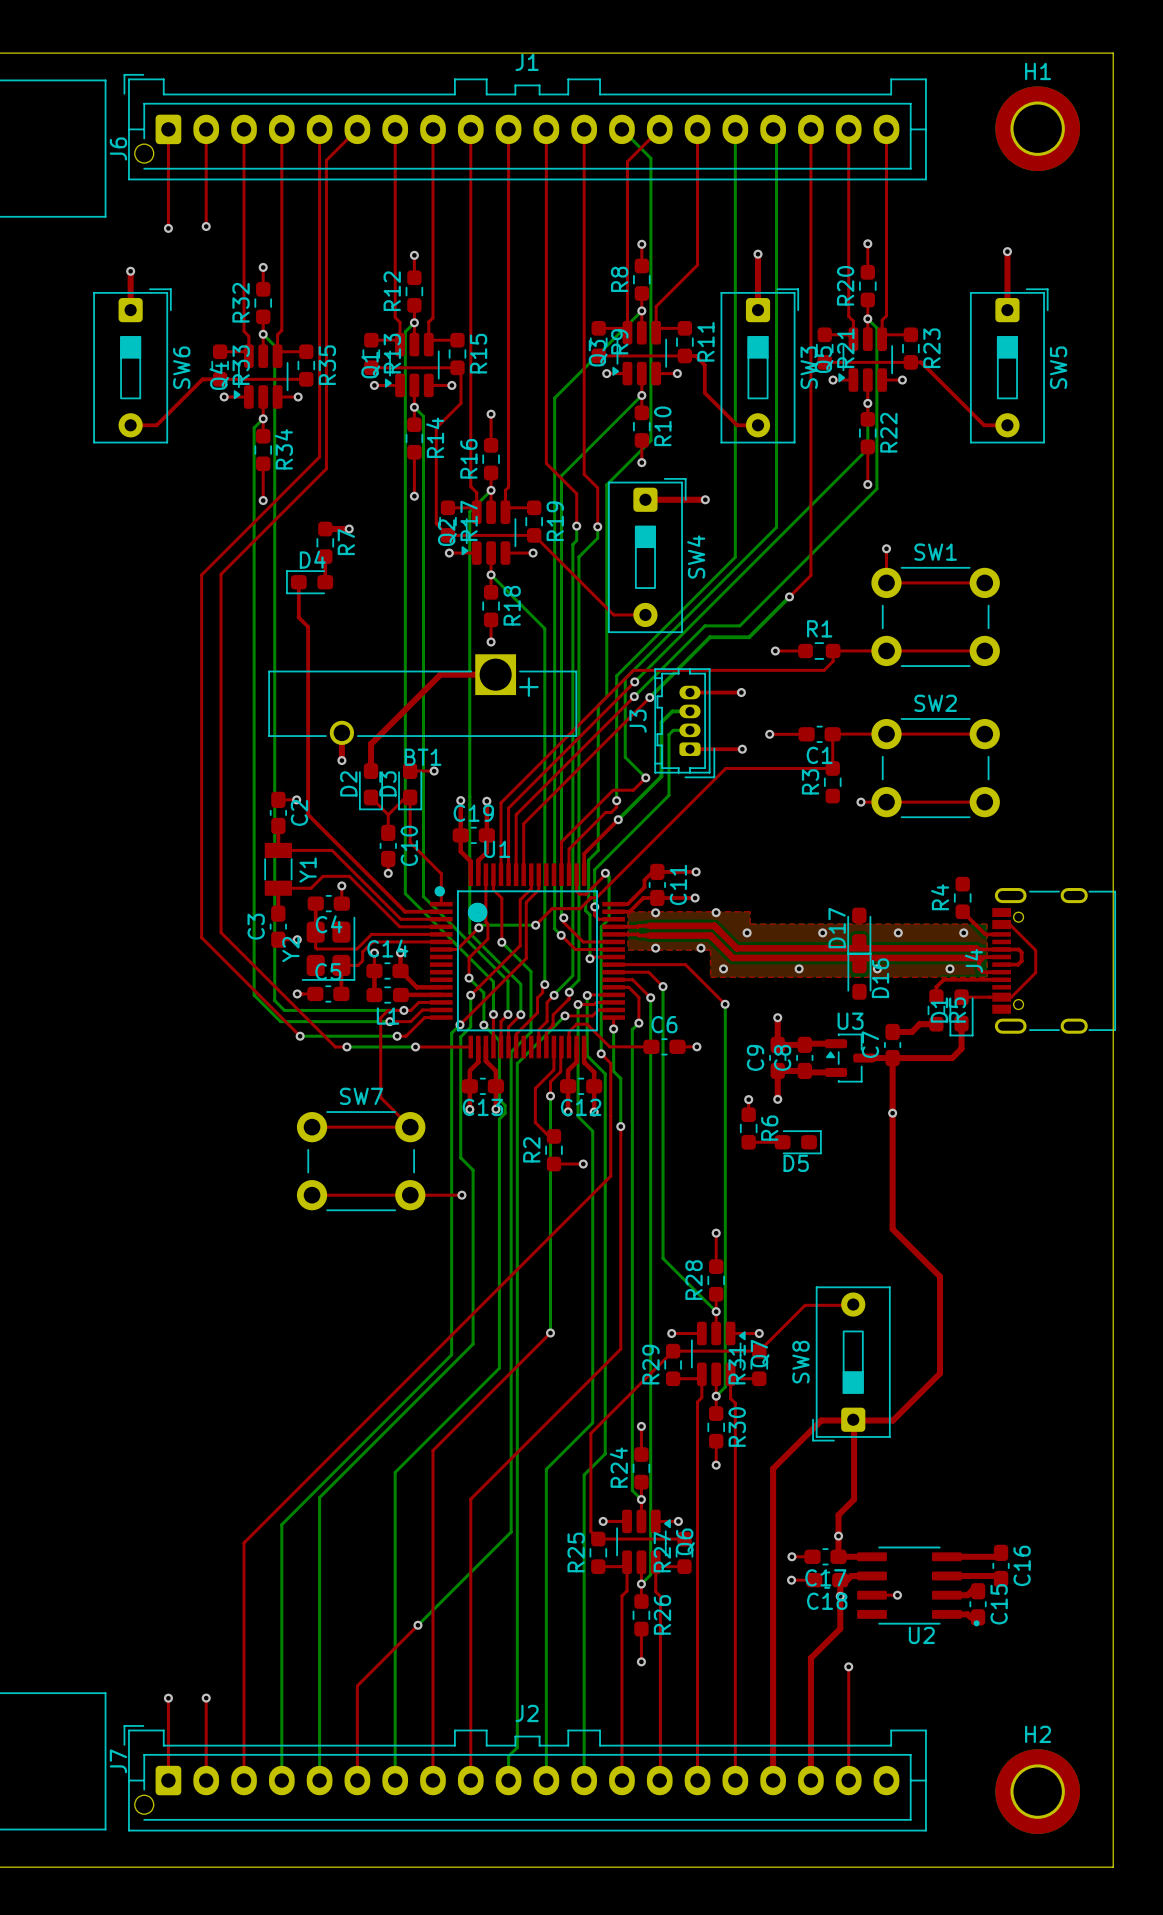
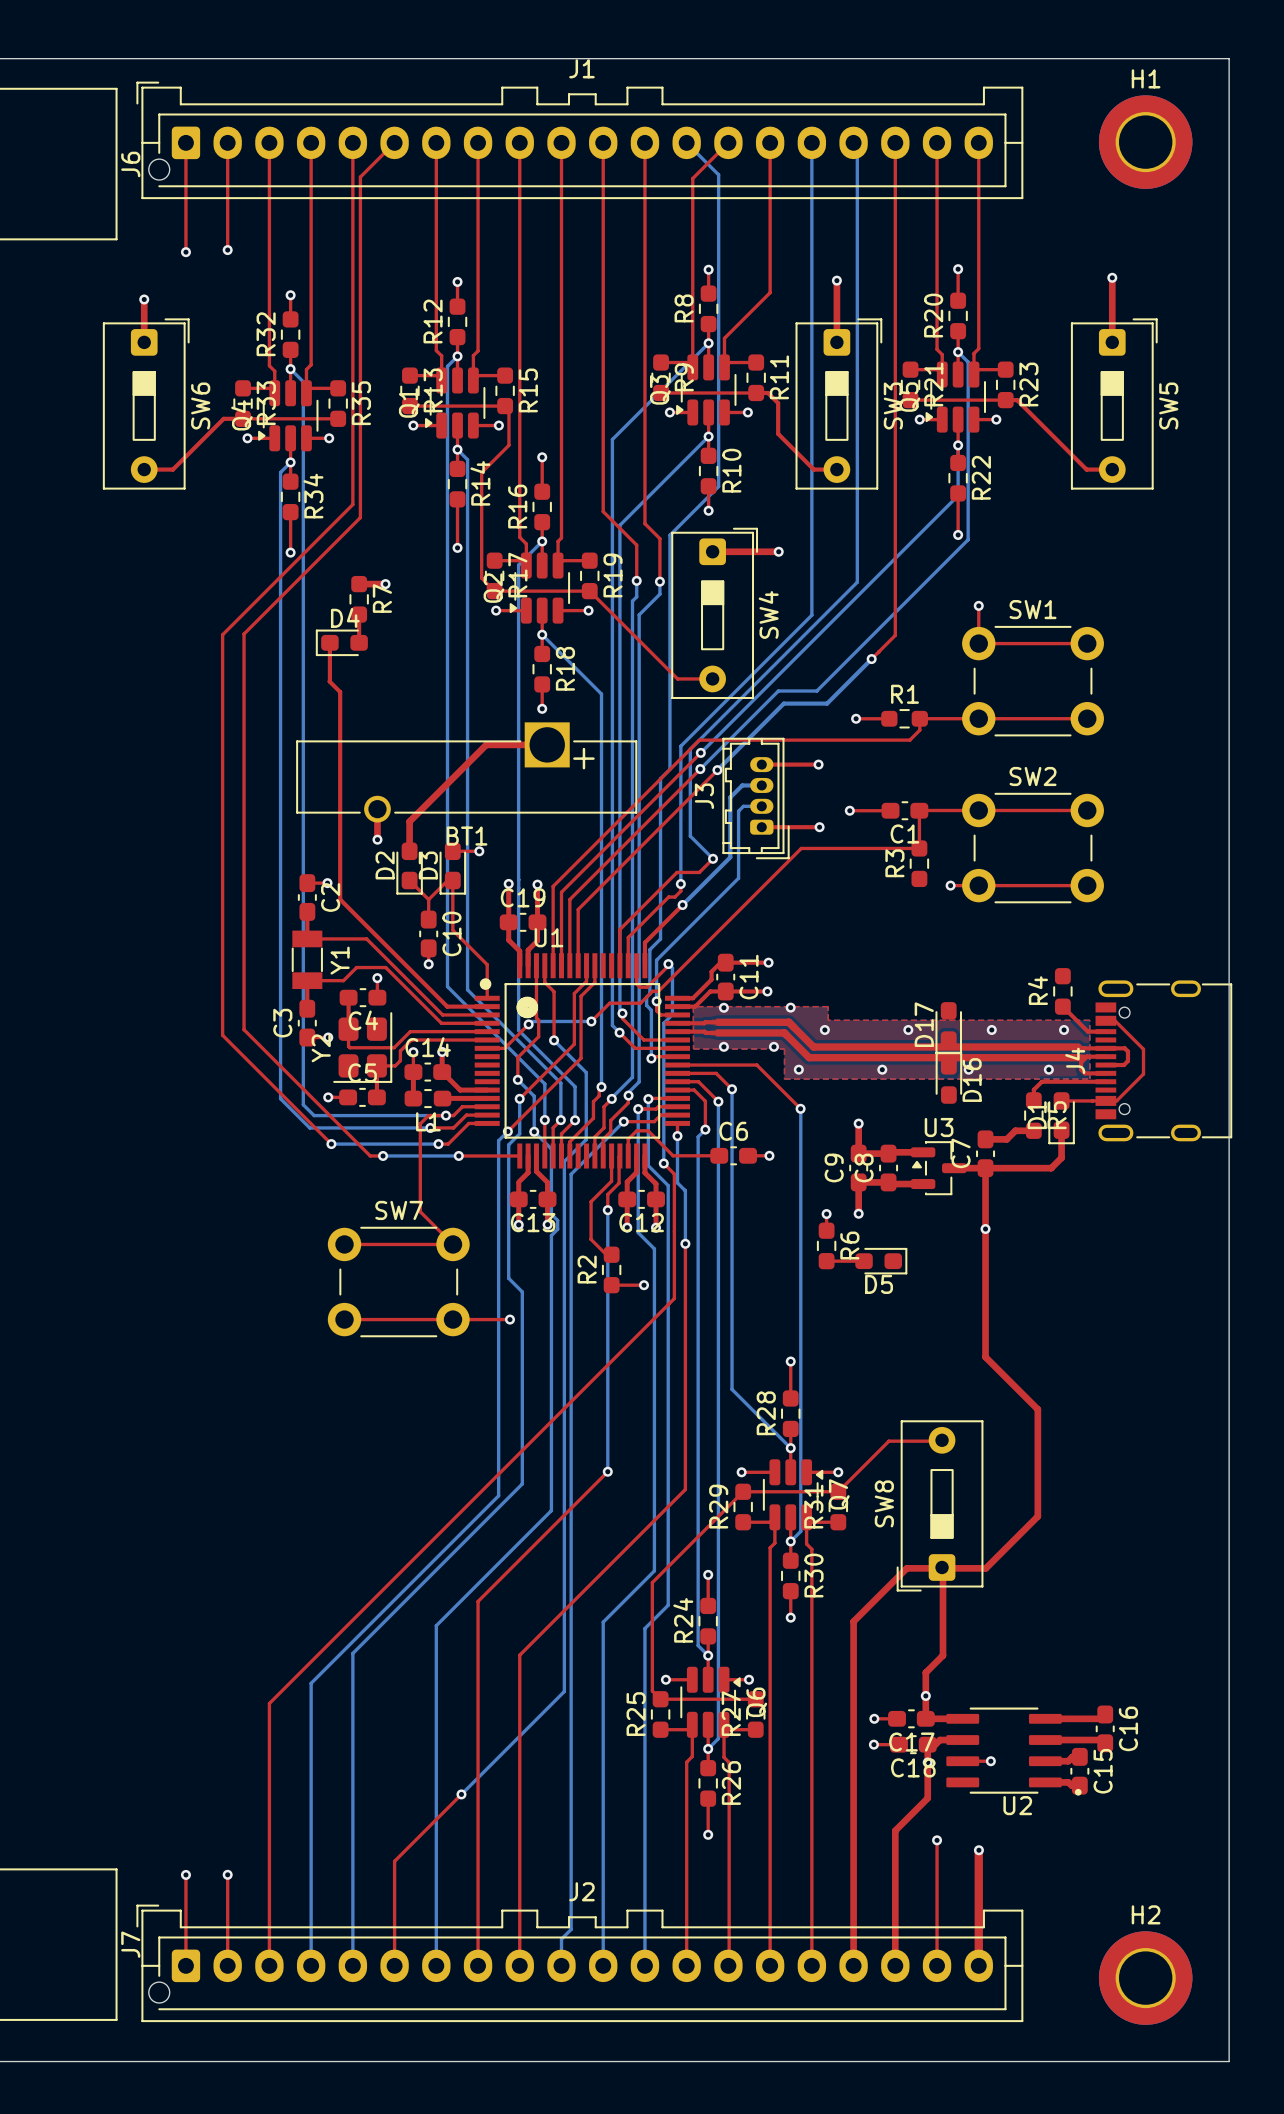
top track: none -> (978, 1850) (978, 1965)
via: none -> (978, 1850)

